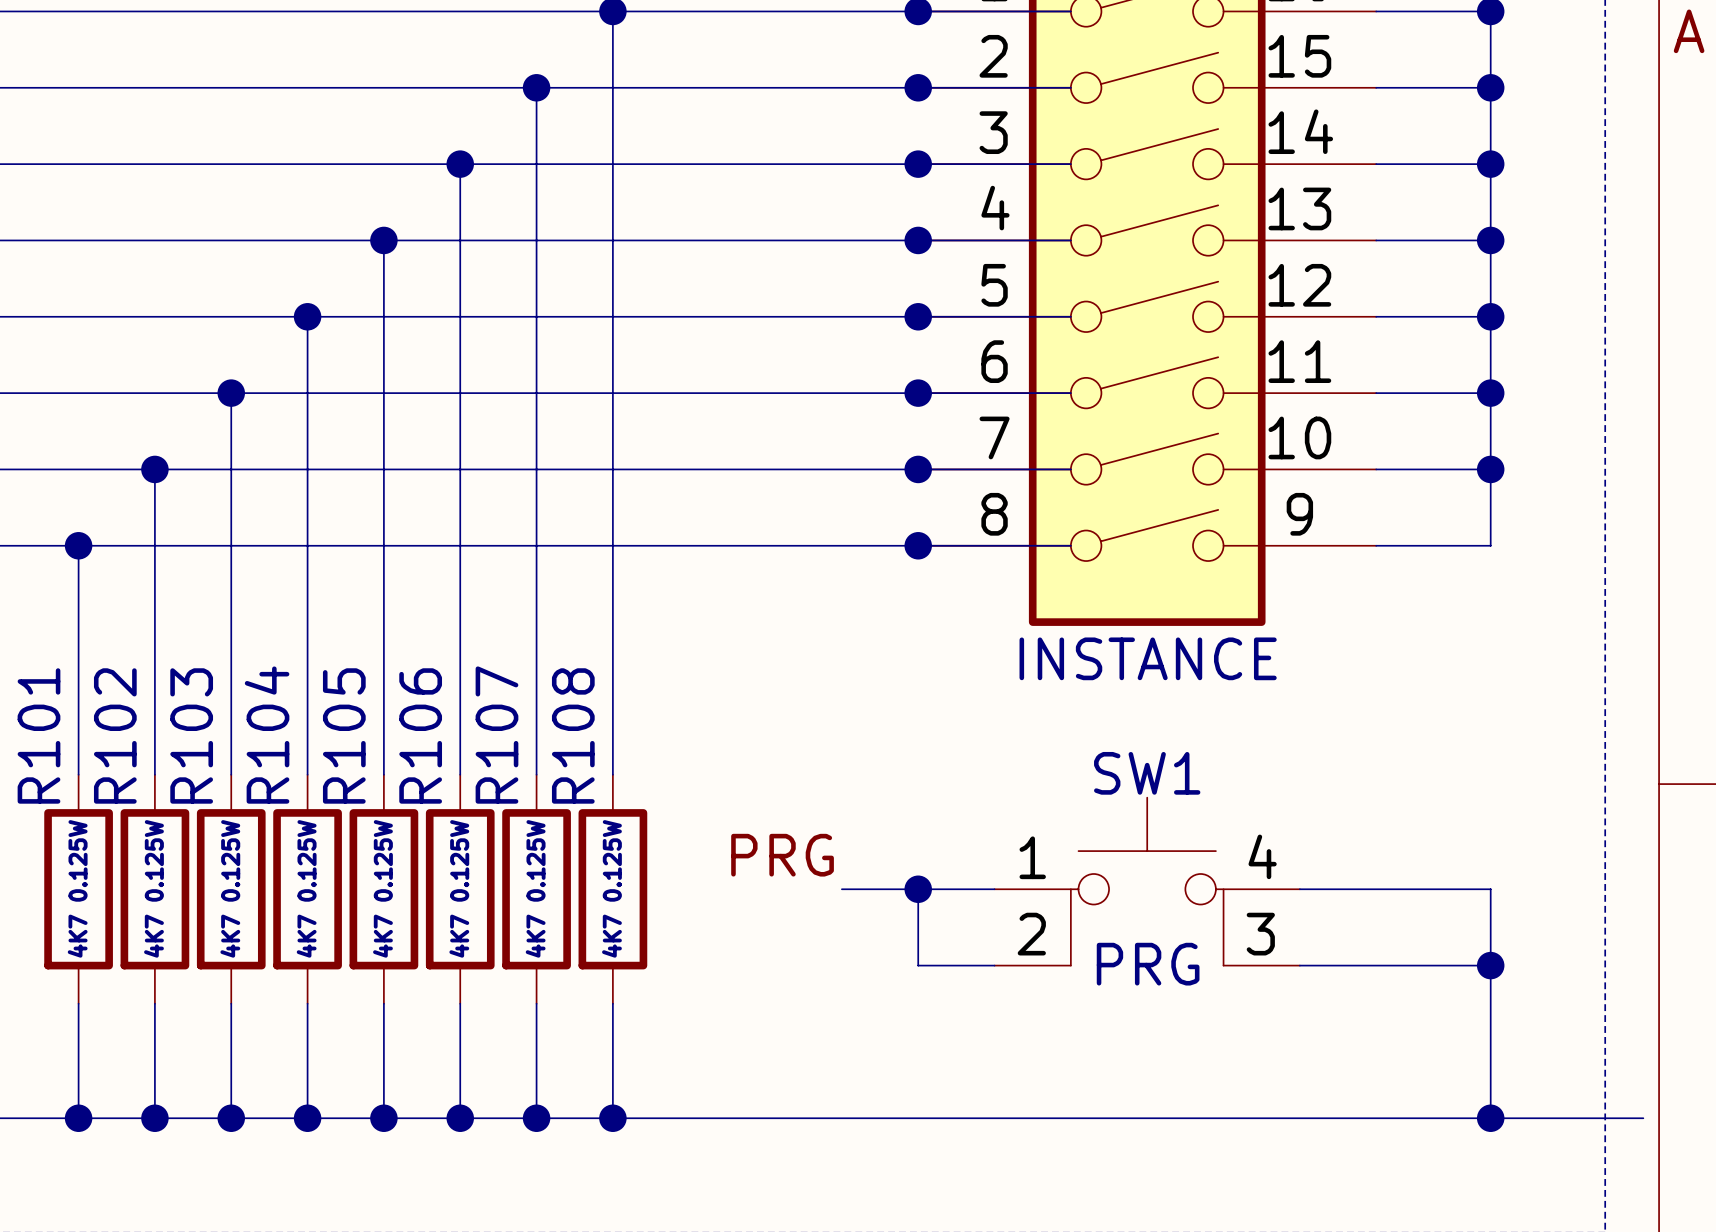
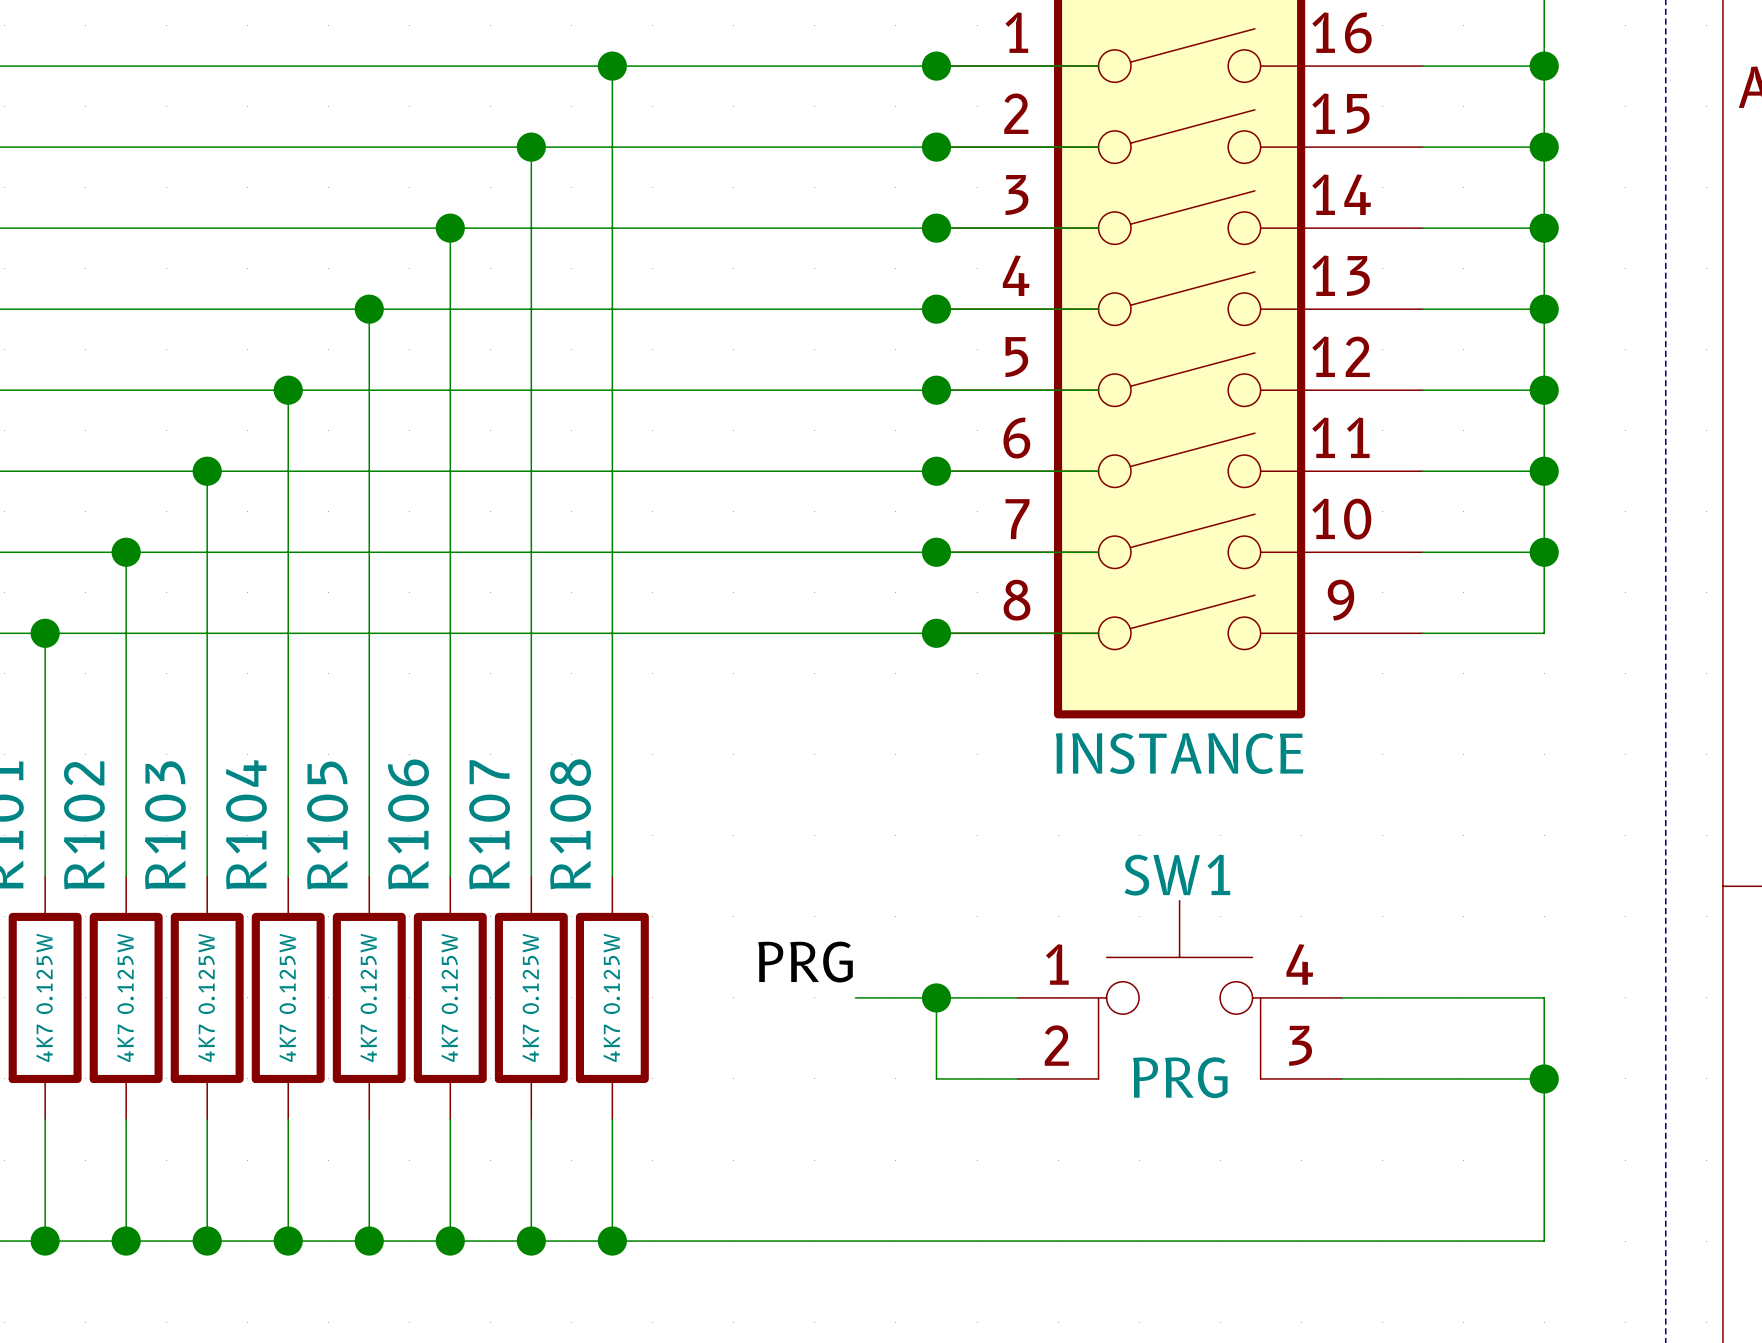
wire: (1490, 1118) (1643, 1118) -> none
junction: (1490, 1118) -> none

